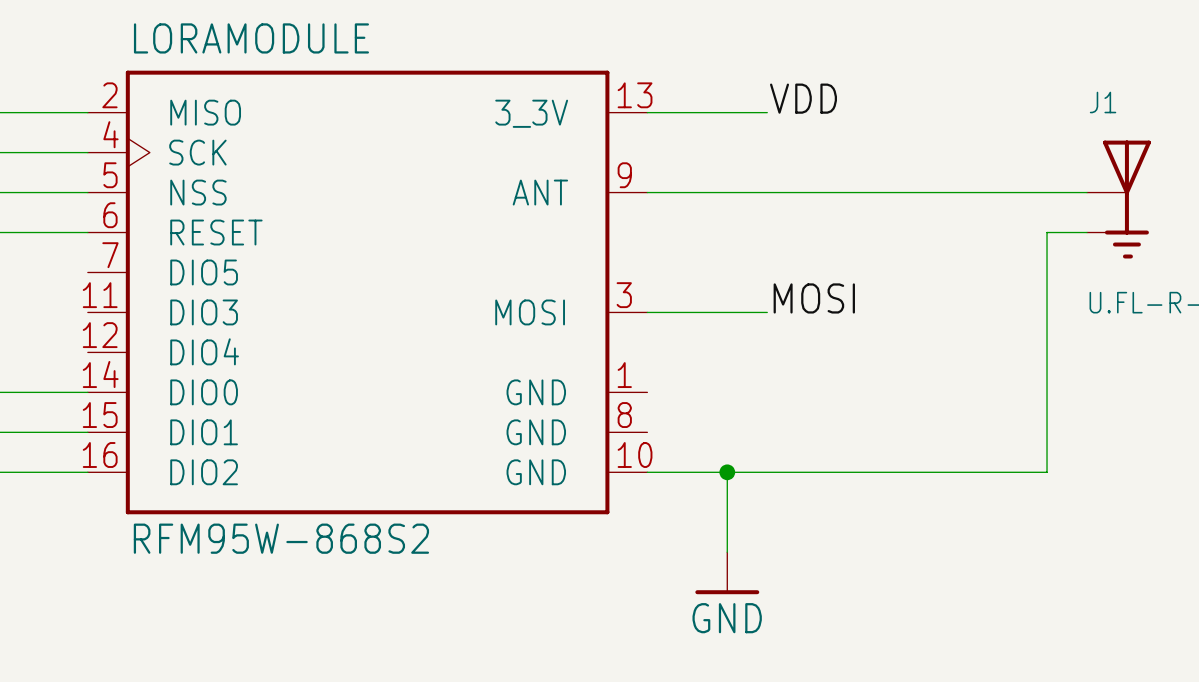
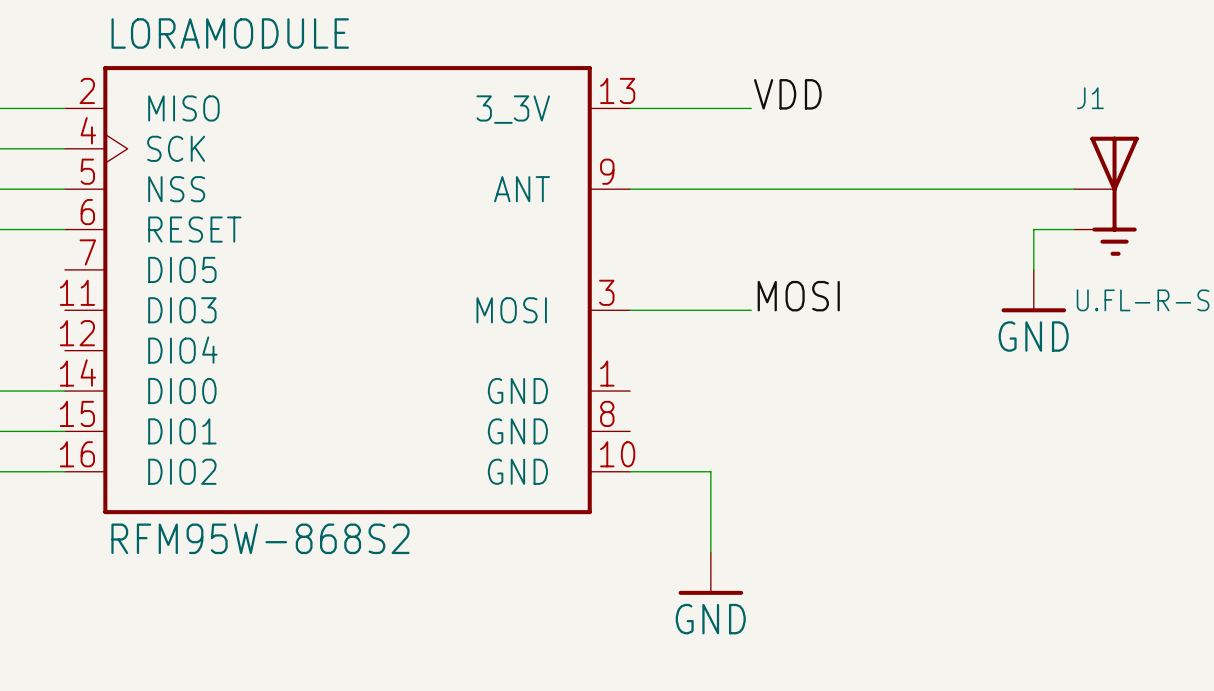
wire: (1047, 272) (1047, 472) (727, 472) -> none
power symbol: none -> GND (1033, 291)
junction: (727, 472) -> none

